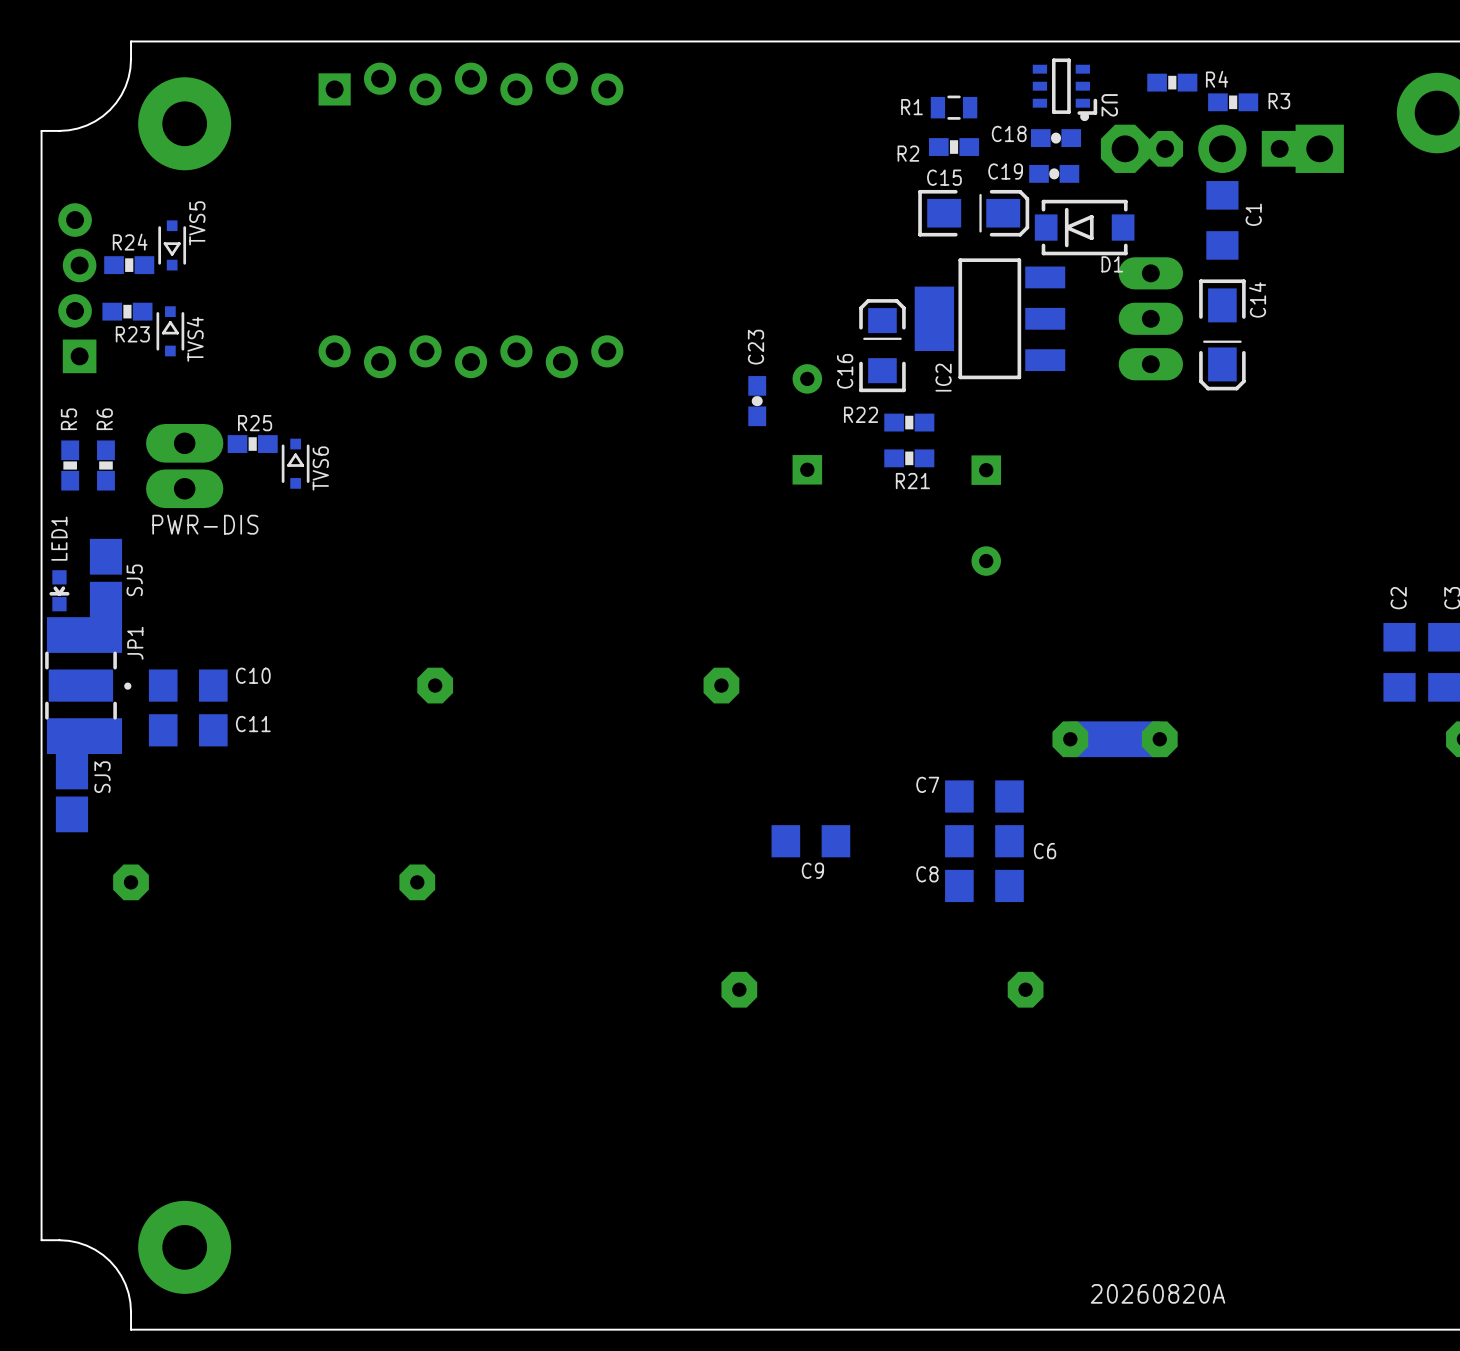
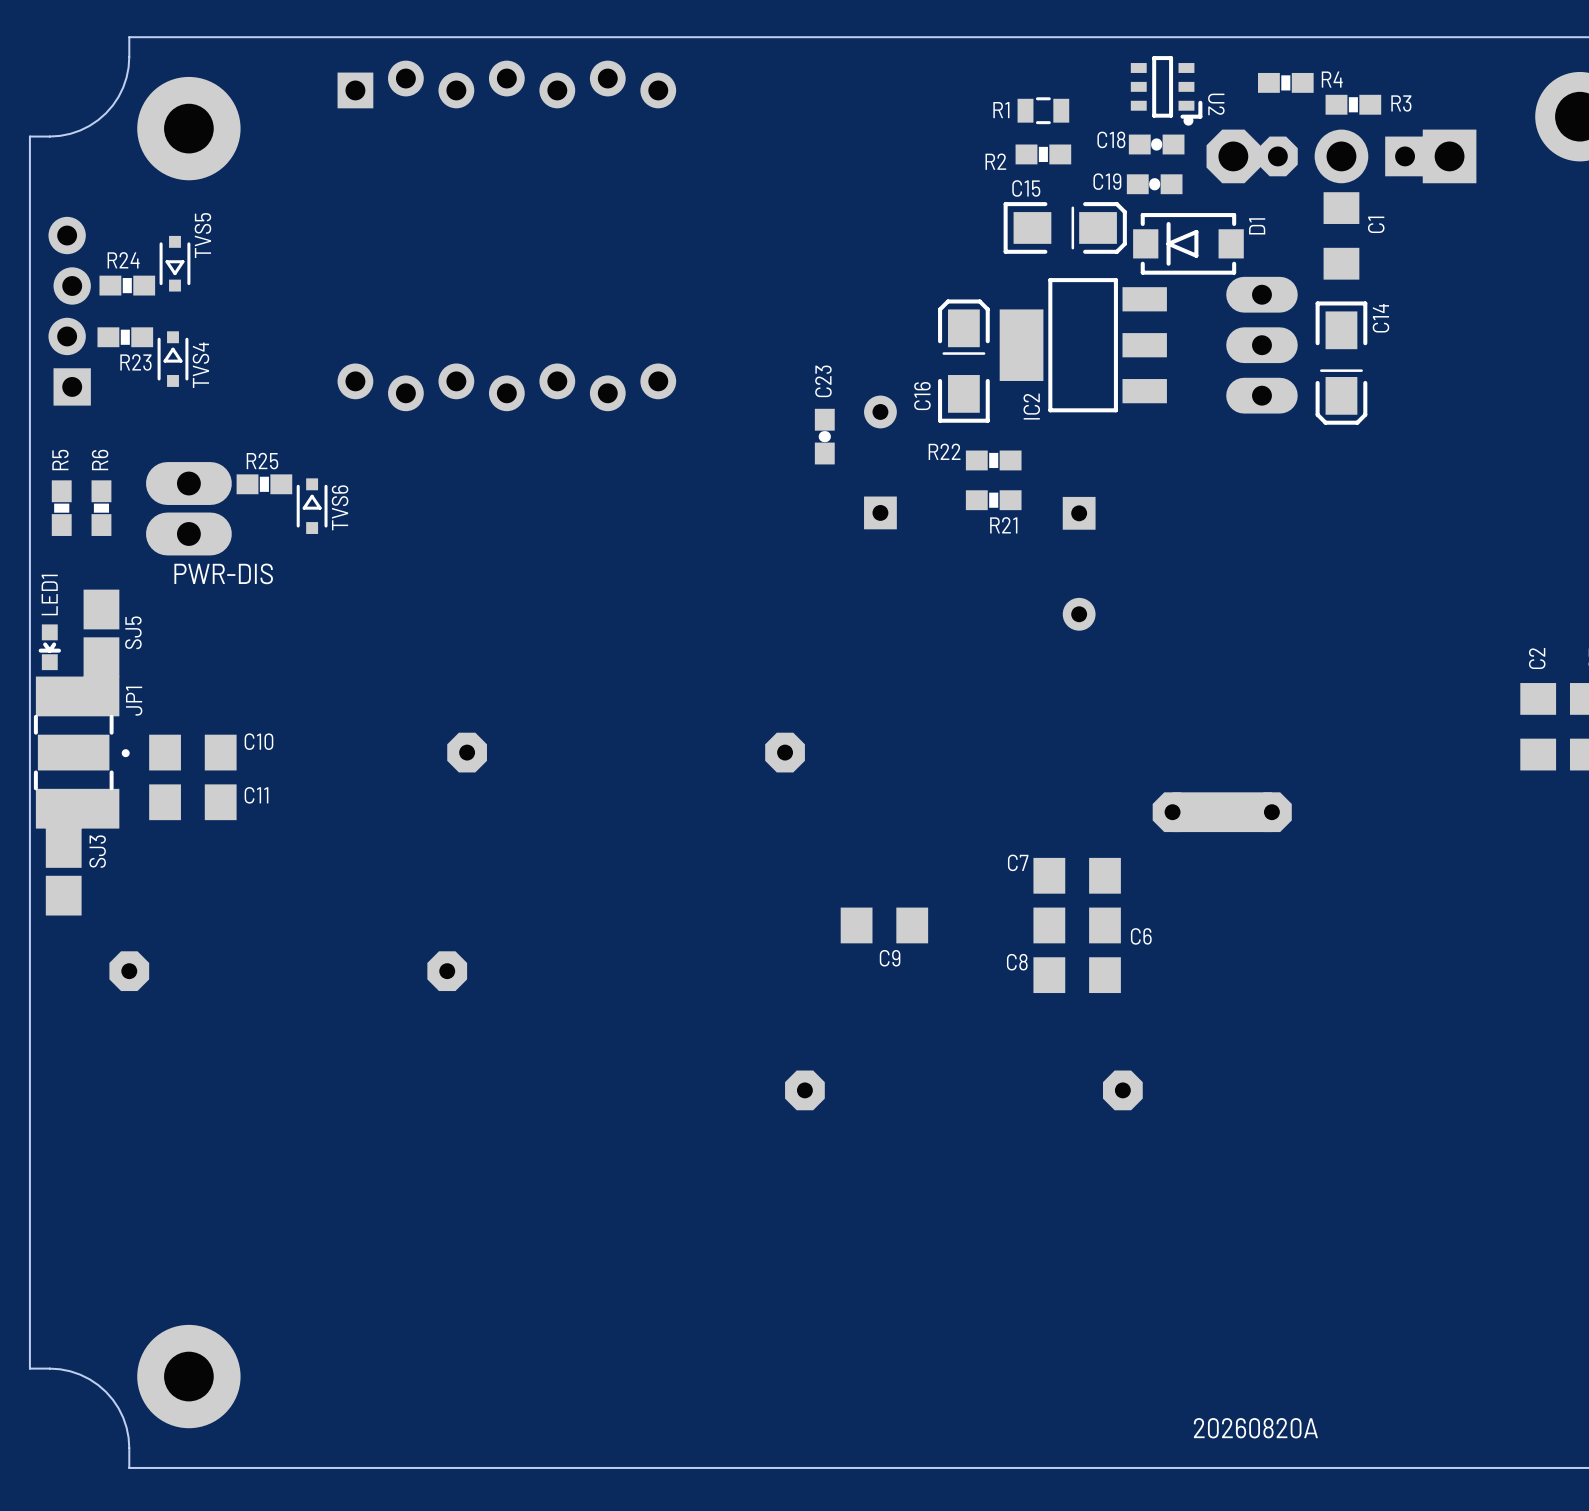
D1 name rotation: 0° (1112, 264) -> 90° counterclockwise (1257, 226)
D1 name position: D1 (1112, 264) -> D1 (1257, 226)
C16 footprint: [859, 299, 906, 393] -> [938, 299, 990, 423]

